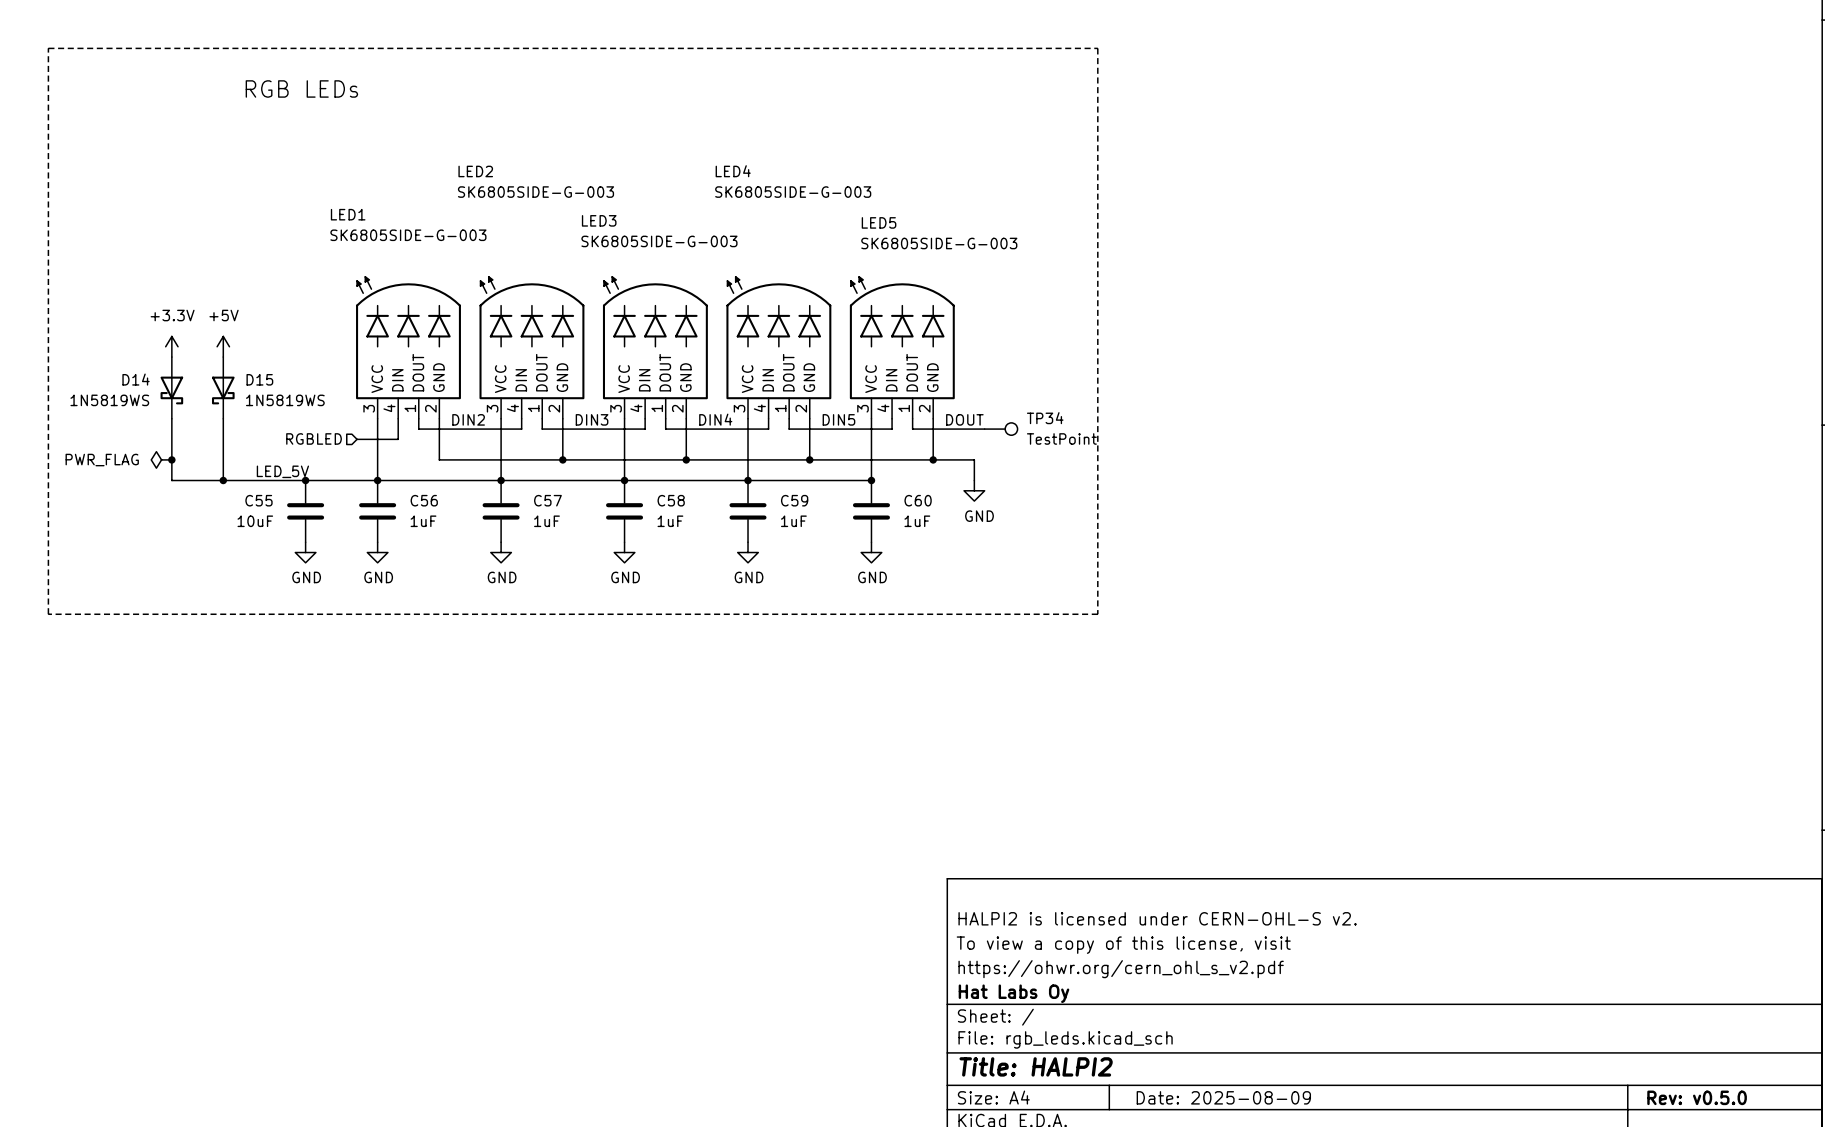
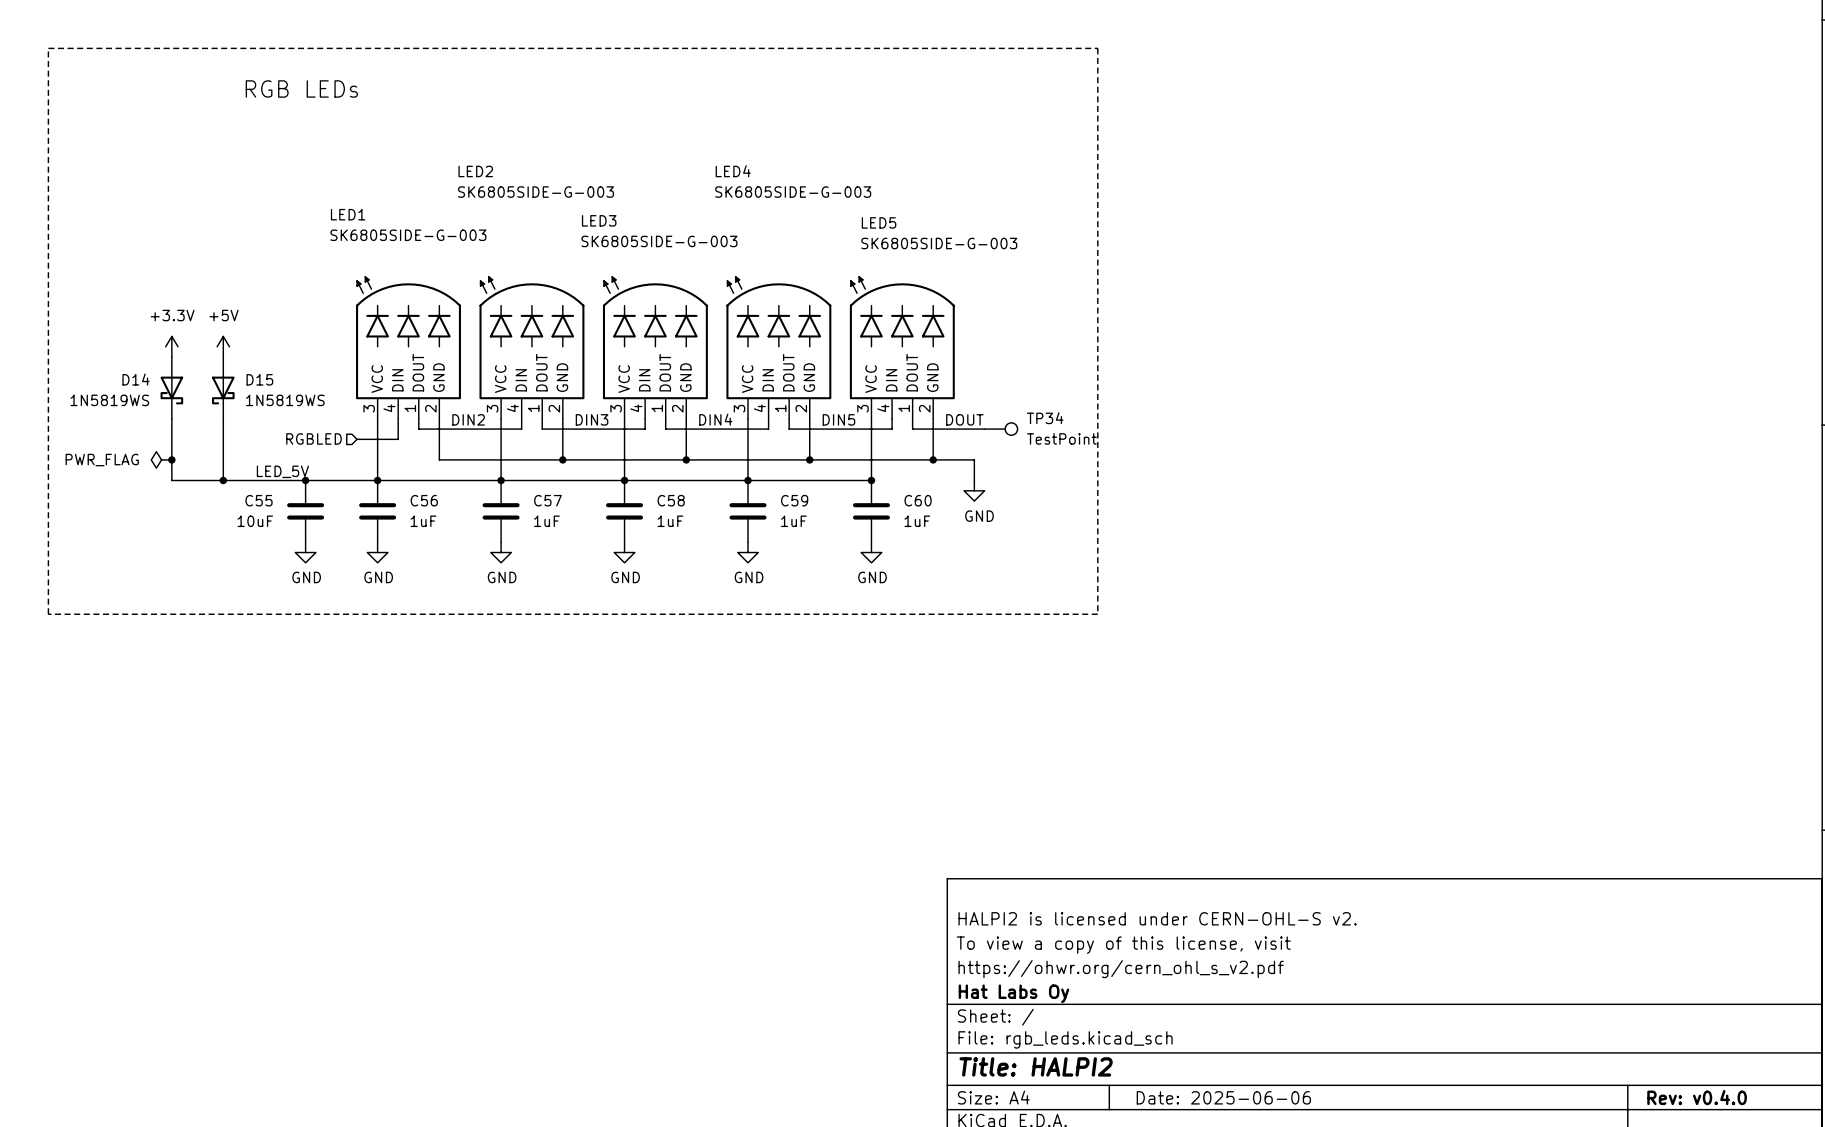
title block: Date: 2025-08-09 (1223, 1097) -> Date: 2025-06-06 (1223, 1097)
title block: Rev: v0.5.0 (1697, 1097) -> Rev: v0.4.0 (1697, 1097)

